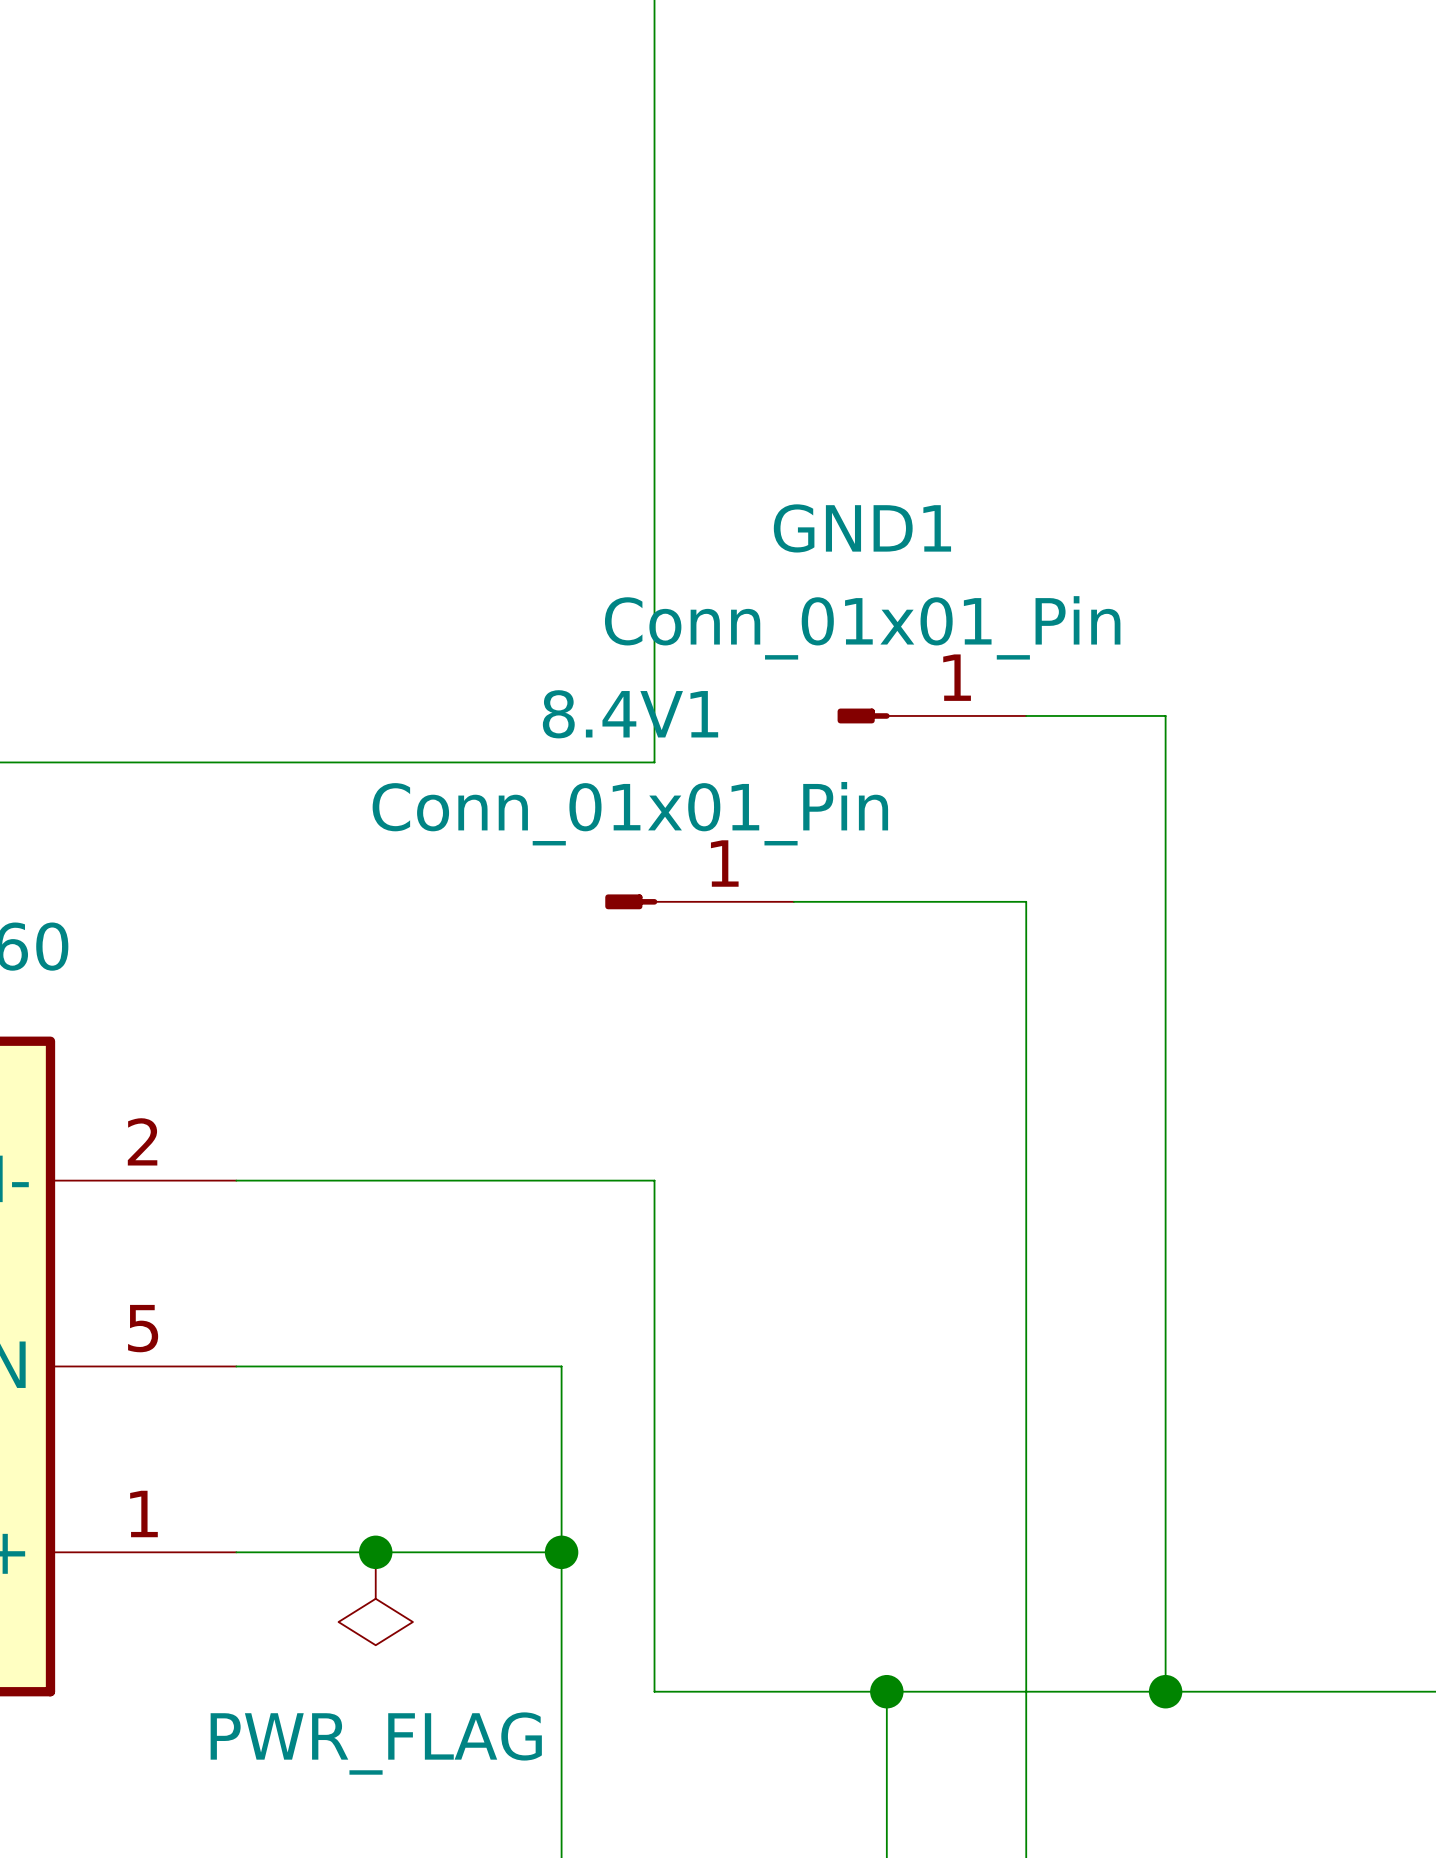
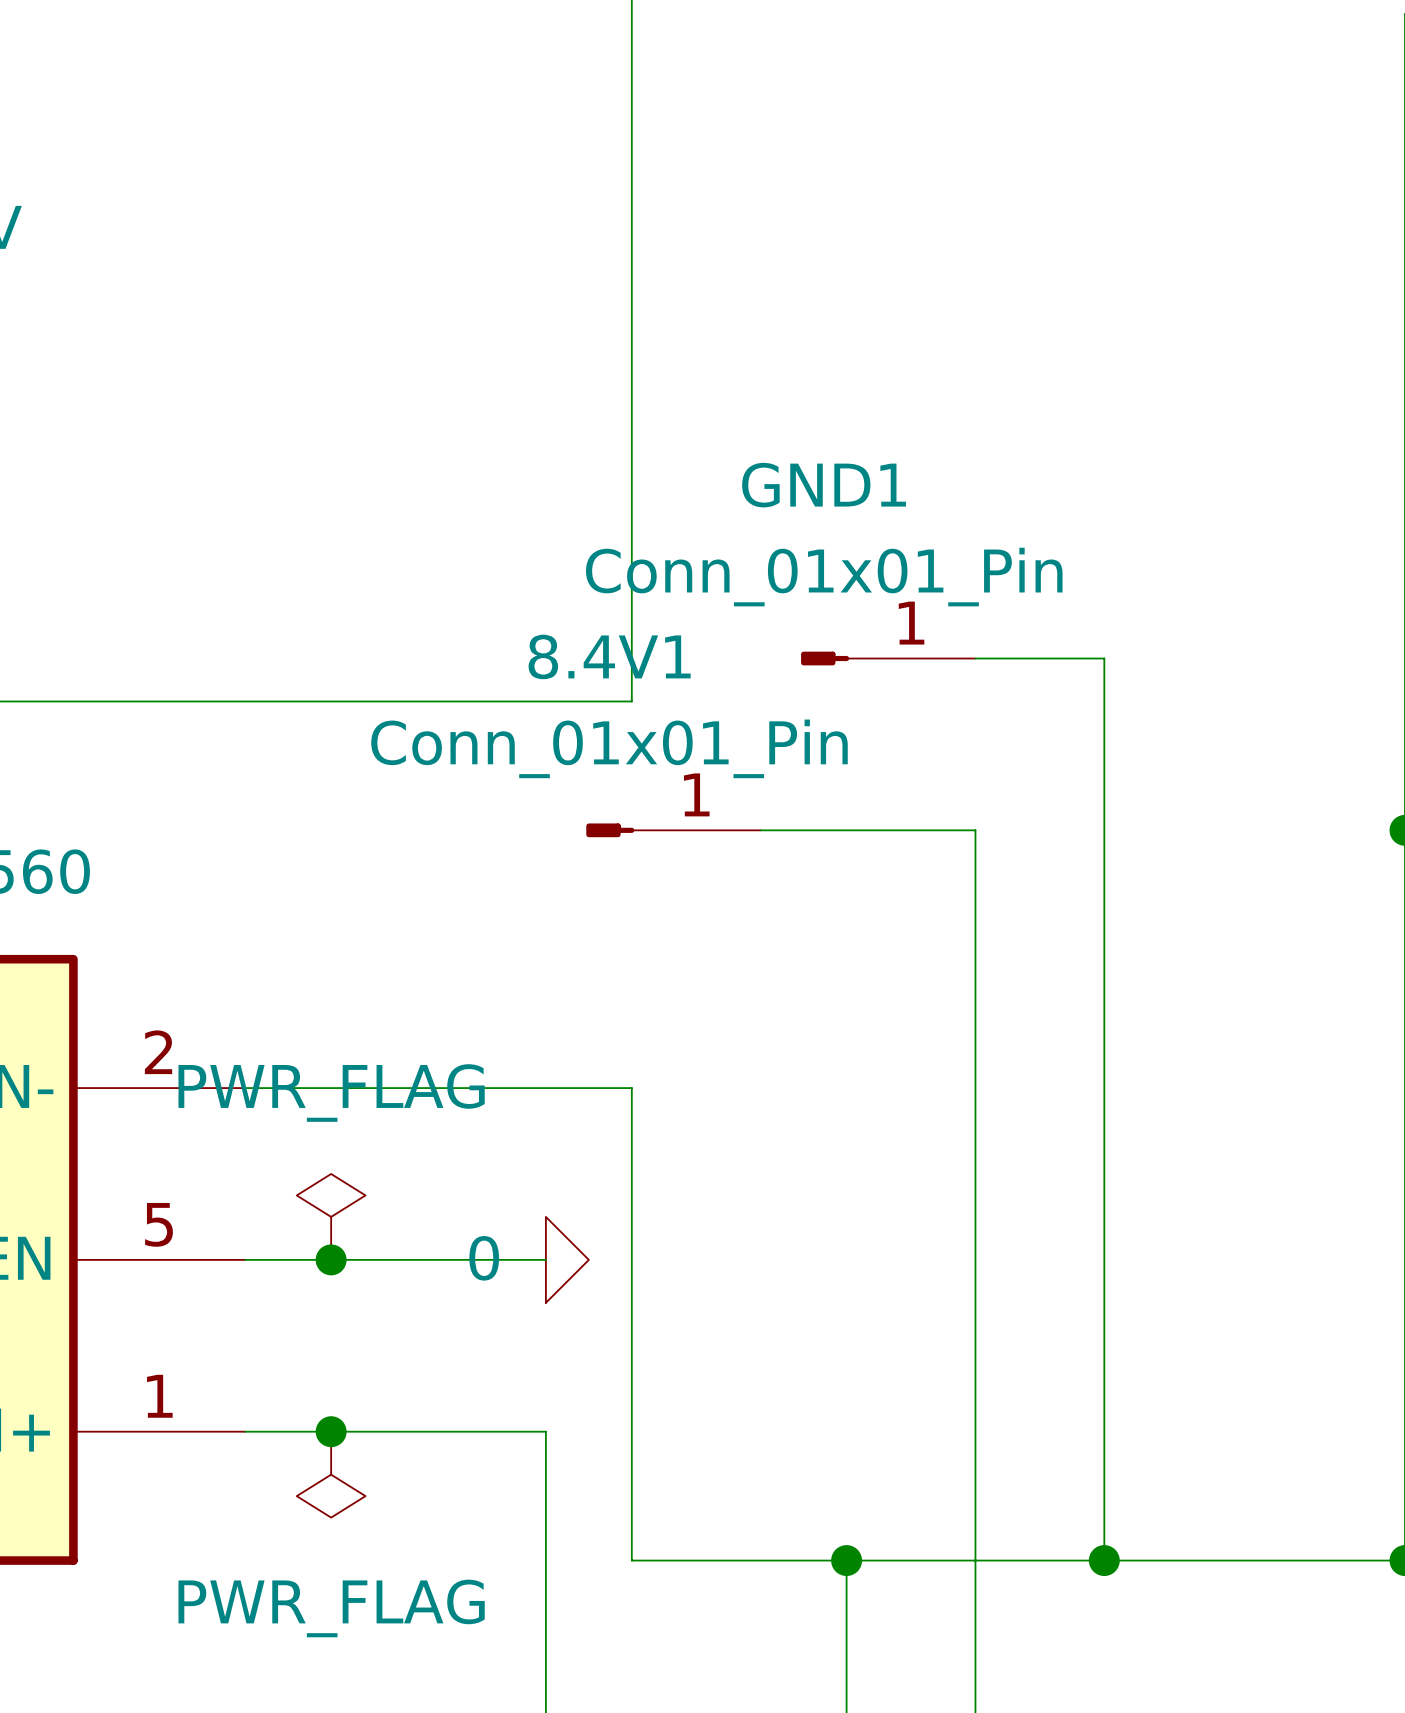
power symbol: none -> PWR_FLAG (331, 1216)
junction: none -> (331, 1259)
wire: (561, 1366) (561, 1552) -> none
power symbol: none -> 0 (567, 1259)
junction position: (375, 1552) -> (331, 1431)
junction: (561, 1552) -> none
power symbol position: PWR_FLAG (375, 1598) -> PWR_FLAG (331, 1474)

